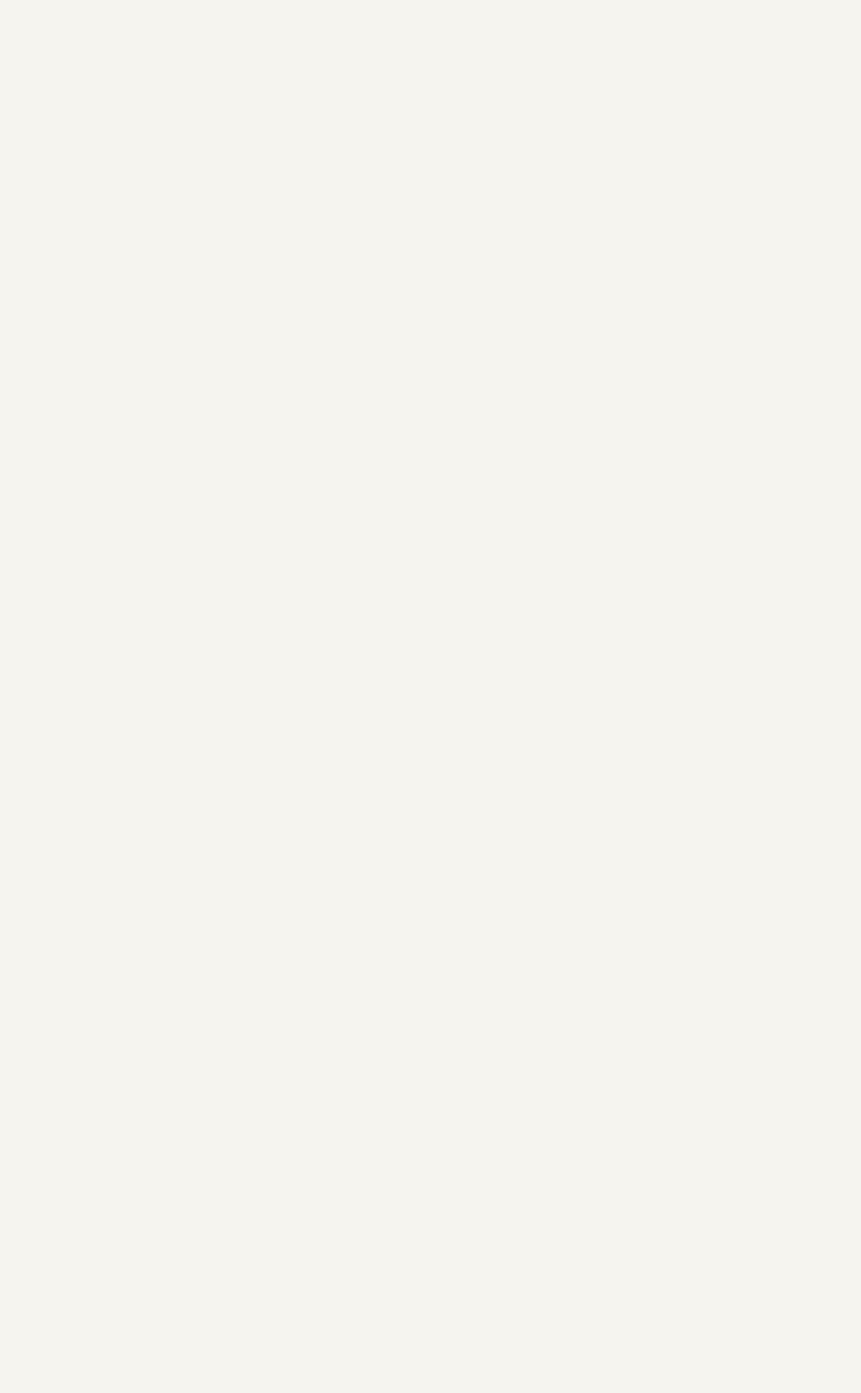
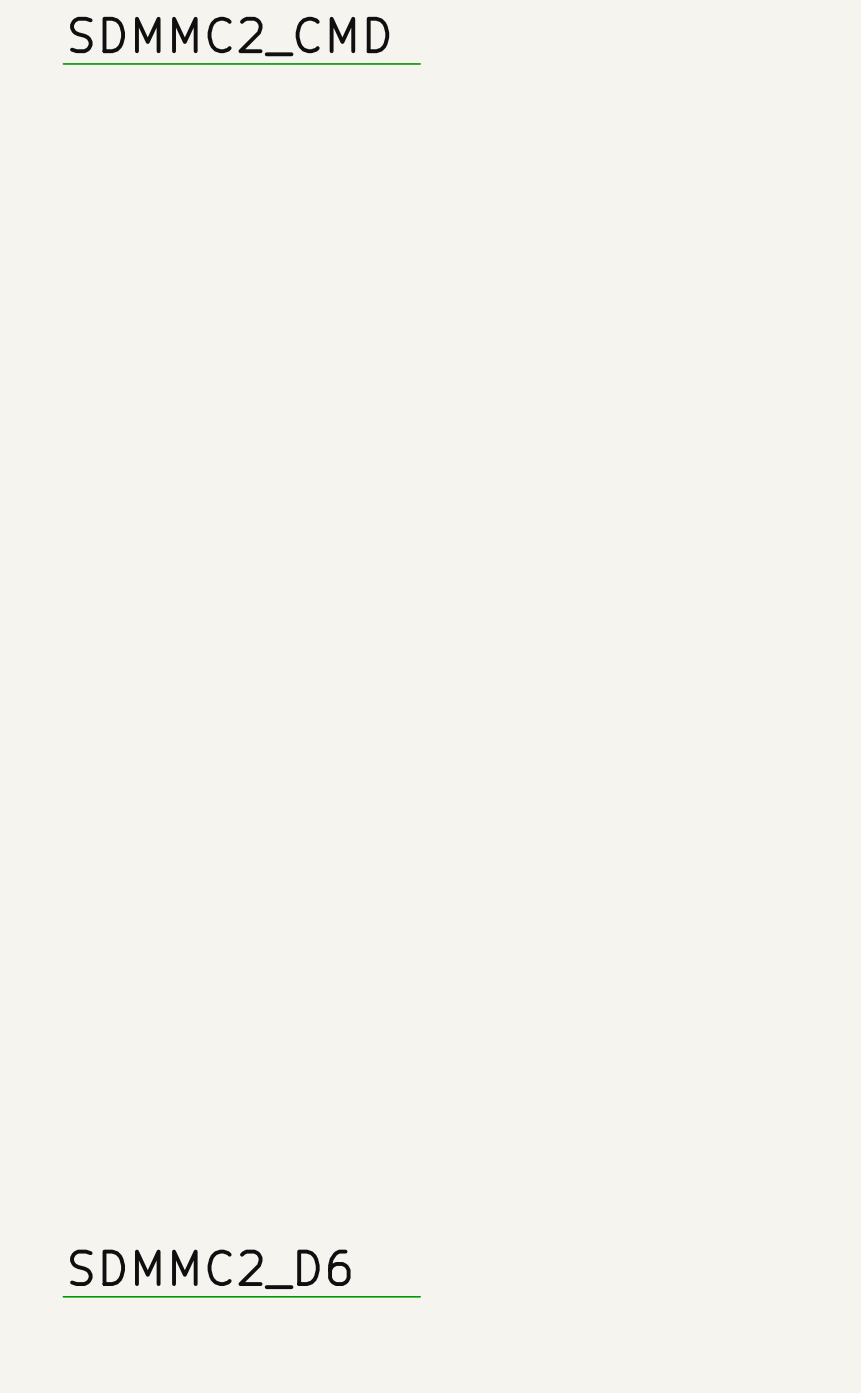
label: none -> SDMMC2_CMD (229, 36)
wire: none -> (63, 63) (420, 63)
label: none -> SDMMC2_D6 (210, 1269)
wire: none -> (63, 1296) (420, 1296)

